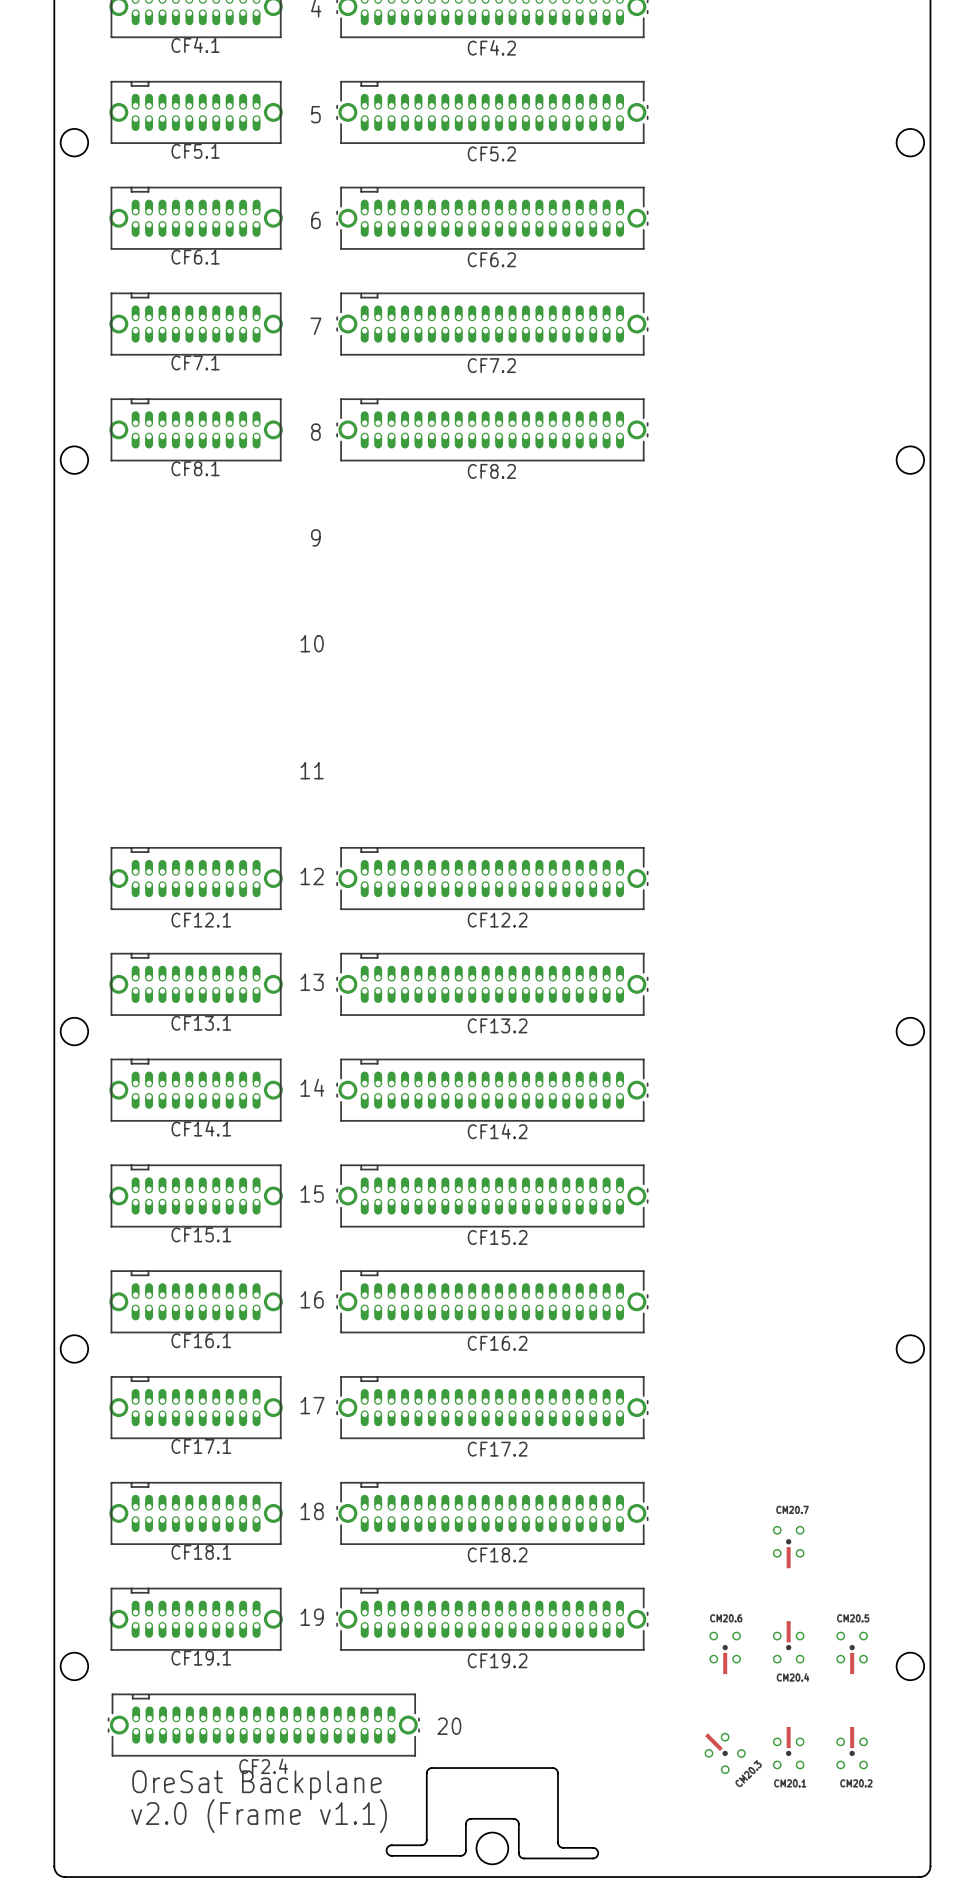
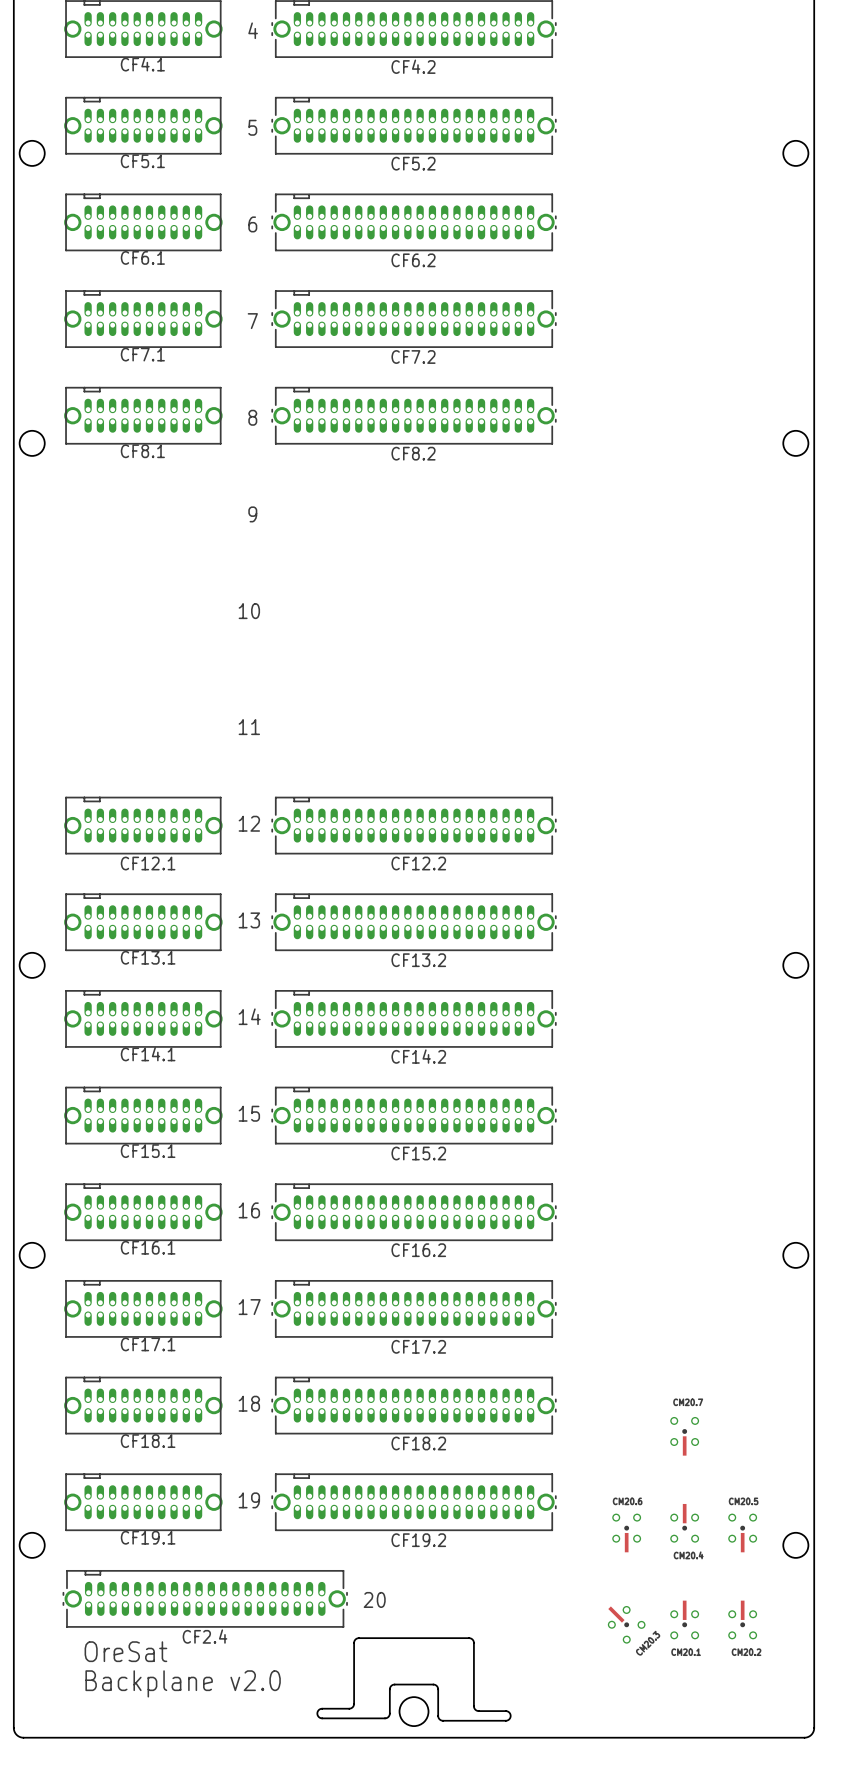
text: OreSat Backplane (256, 1785) -> OreSat (125, 1651)
text: v2.0 (Frame v1.1) (259, 1816) -> Backplane v2.0 (183, 1683)

